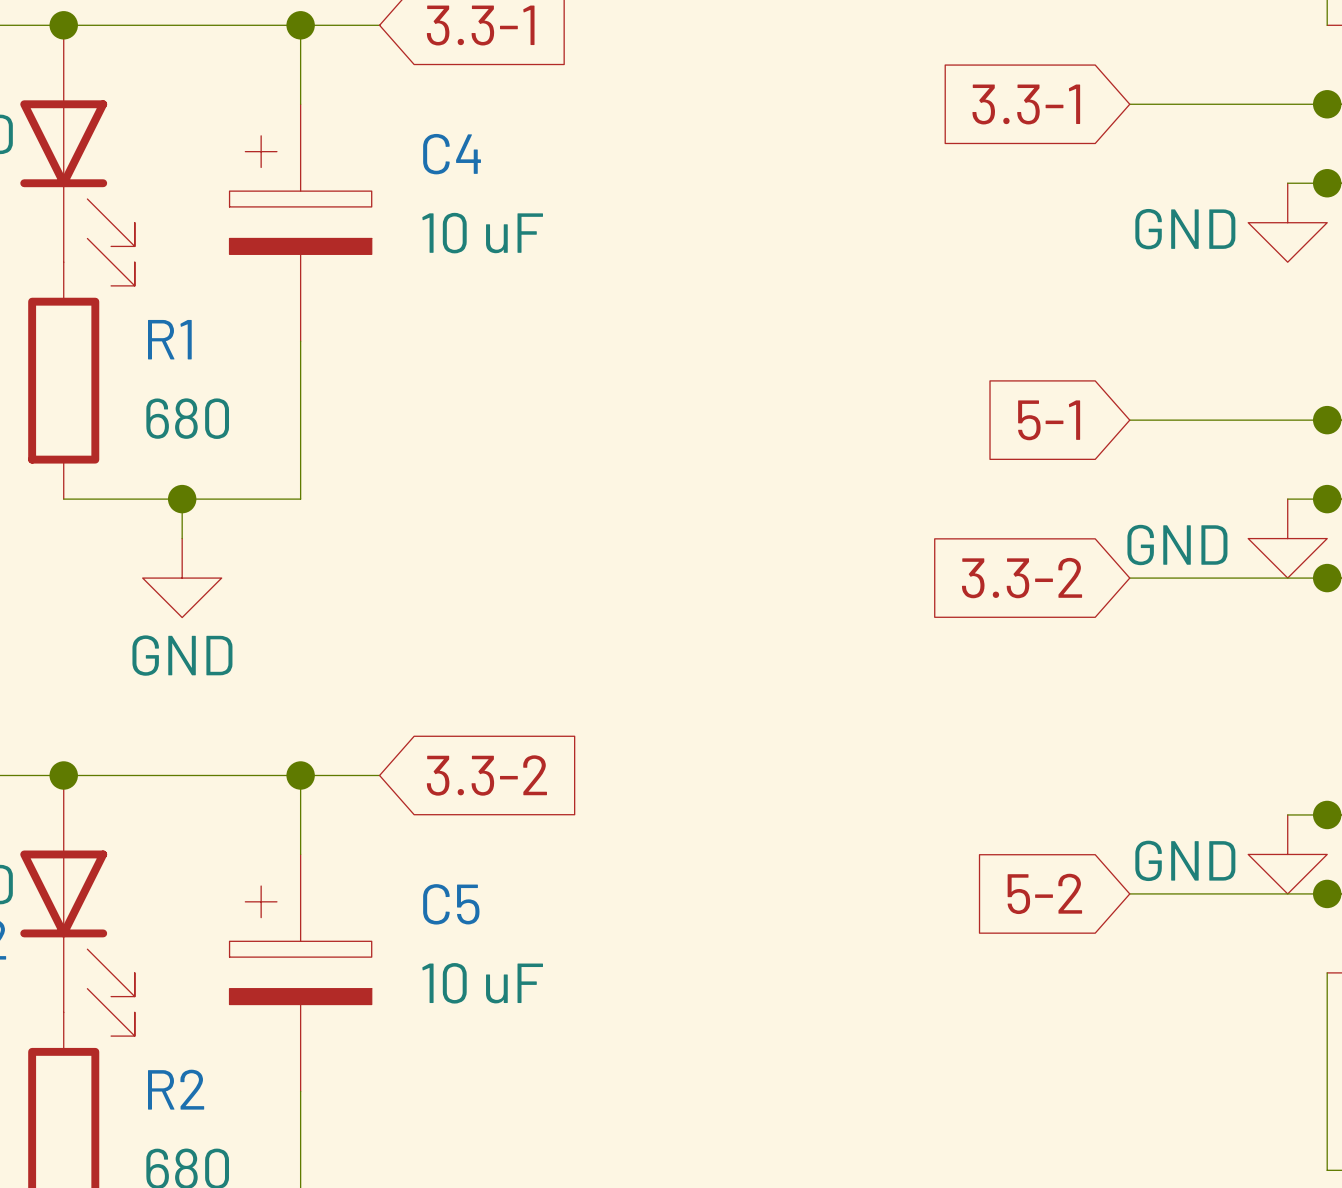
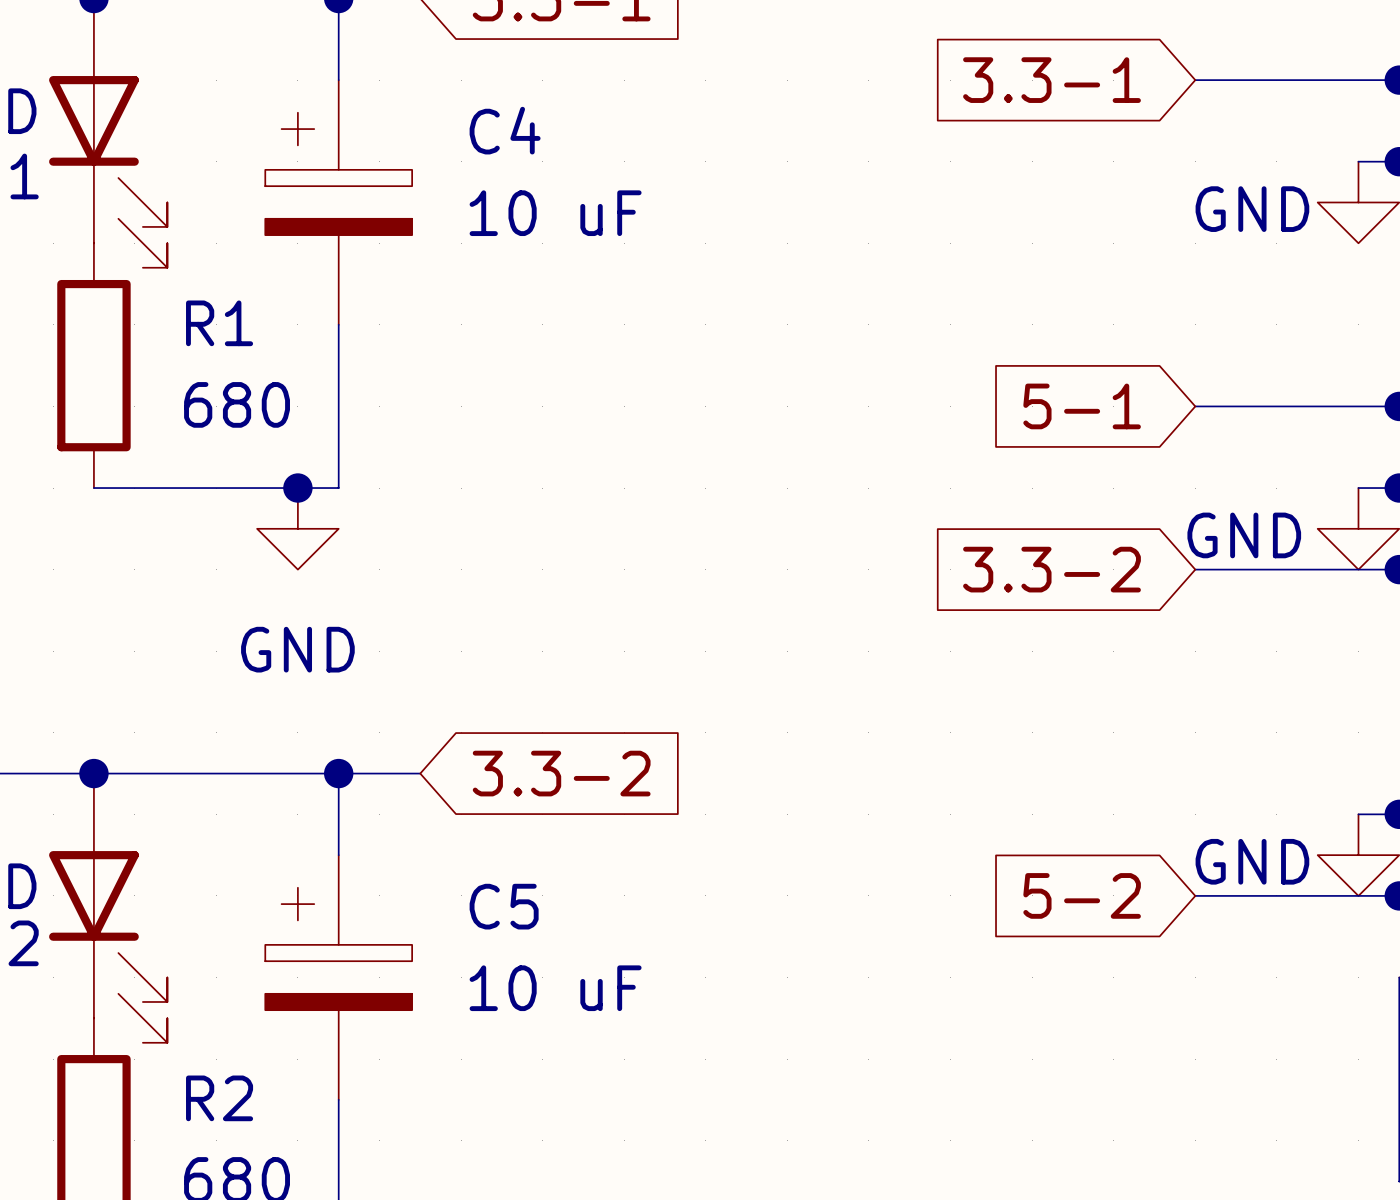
wire: (182, 499) (182, 538) -> none
junction position: (182, 499) -> (297, 488)
power symbol position: GND (182, 578) -> GND (297, 528)
power symbol text position: GND (182, 655) -> GND (297, 649)

